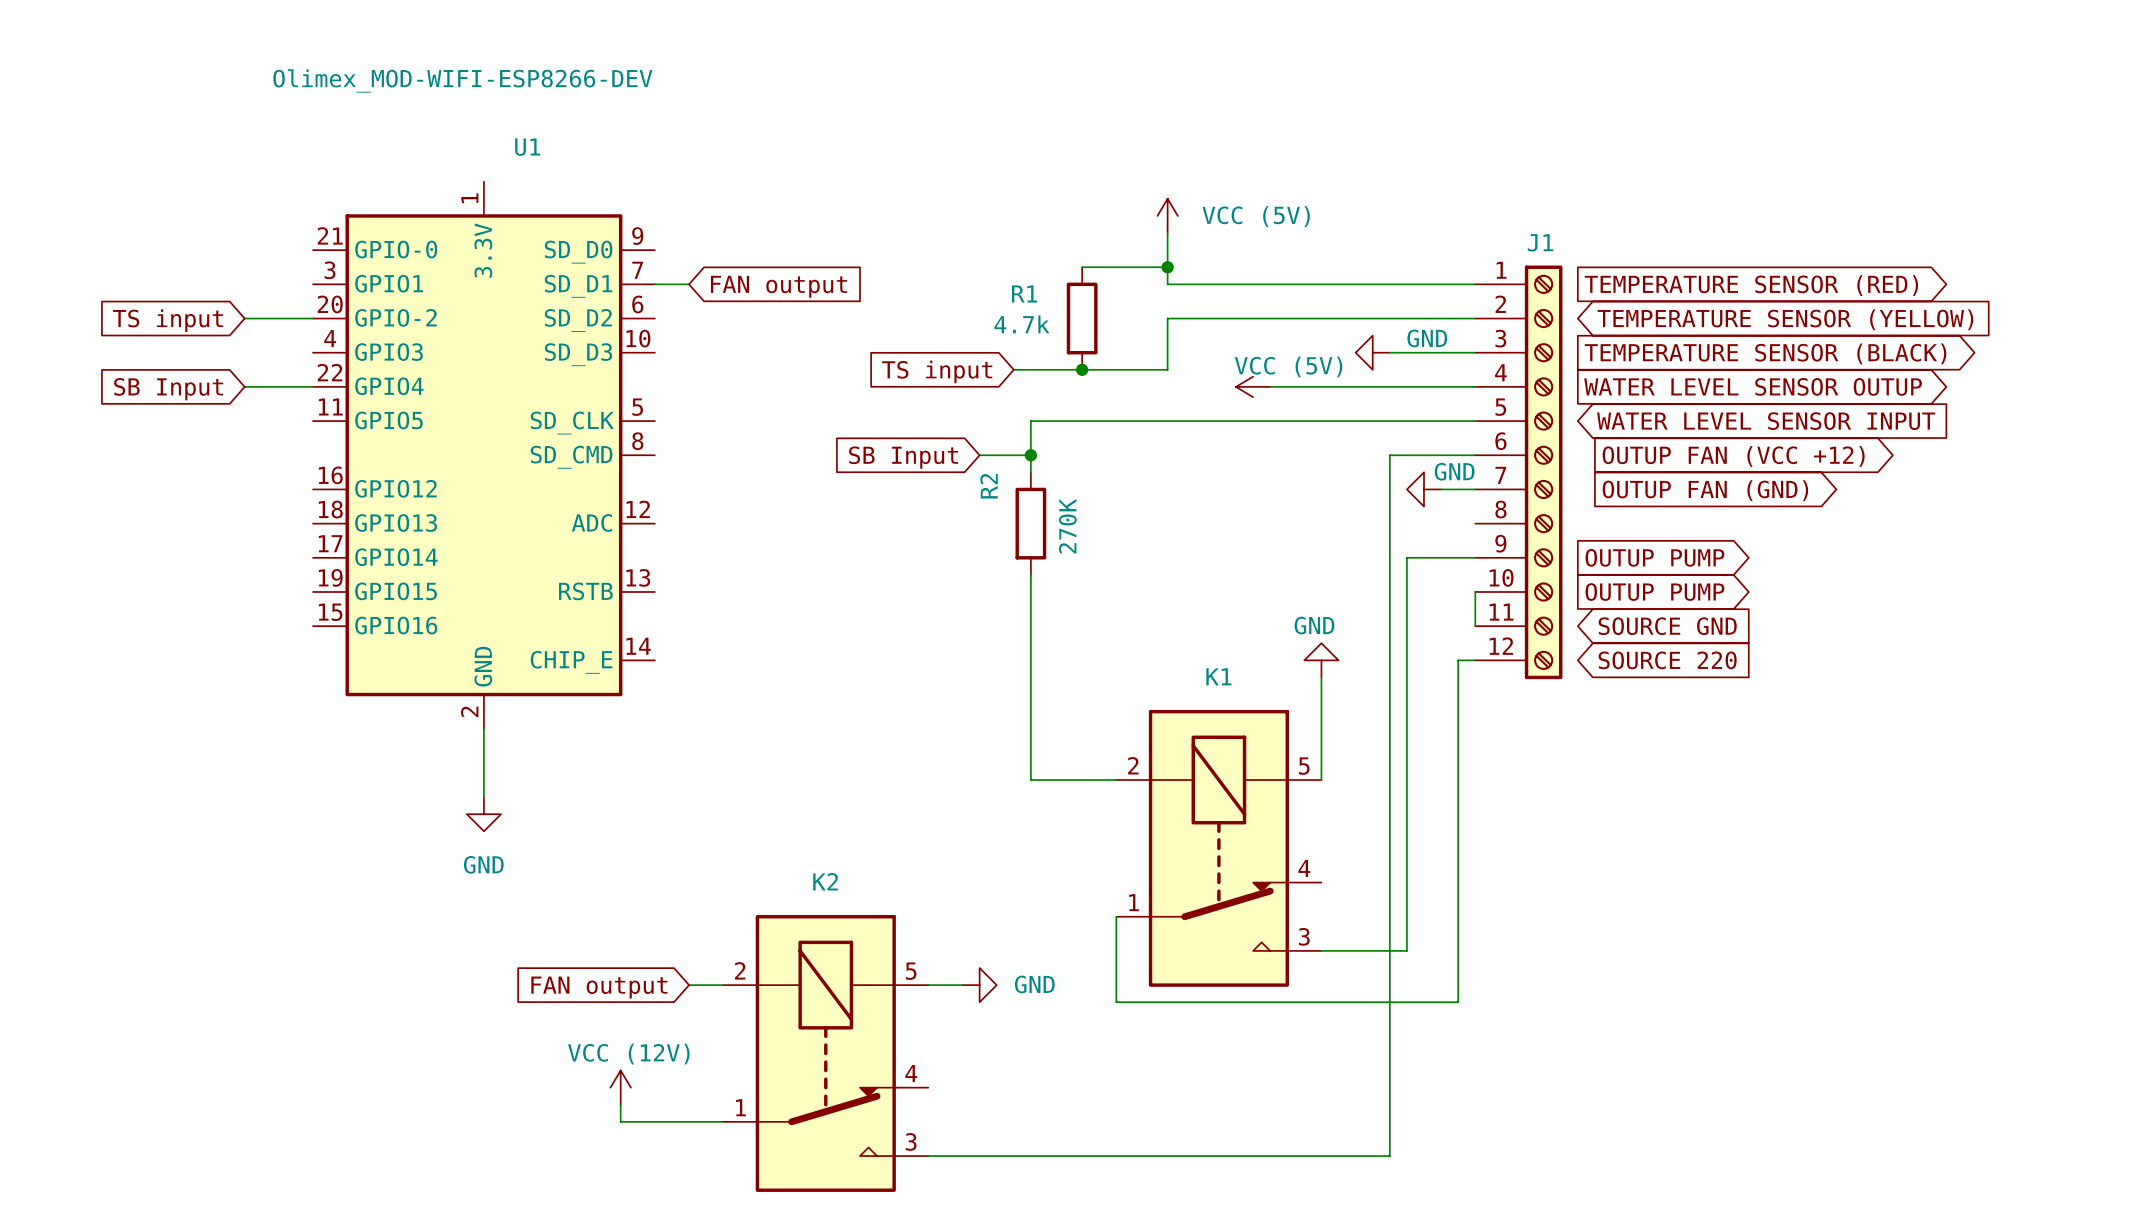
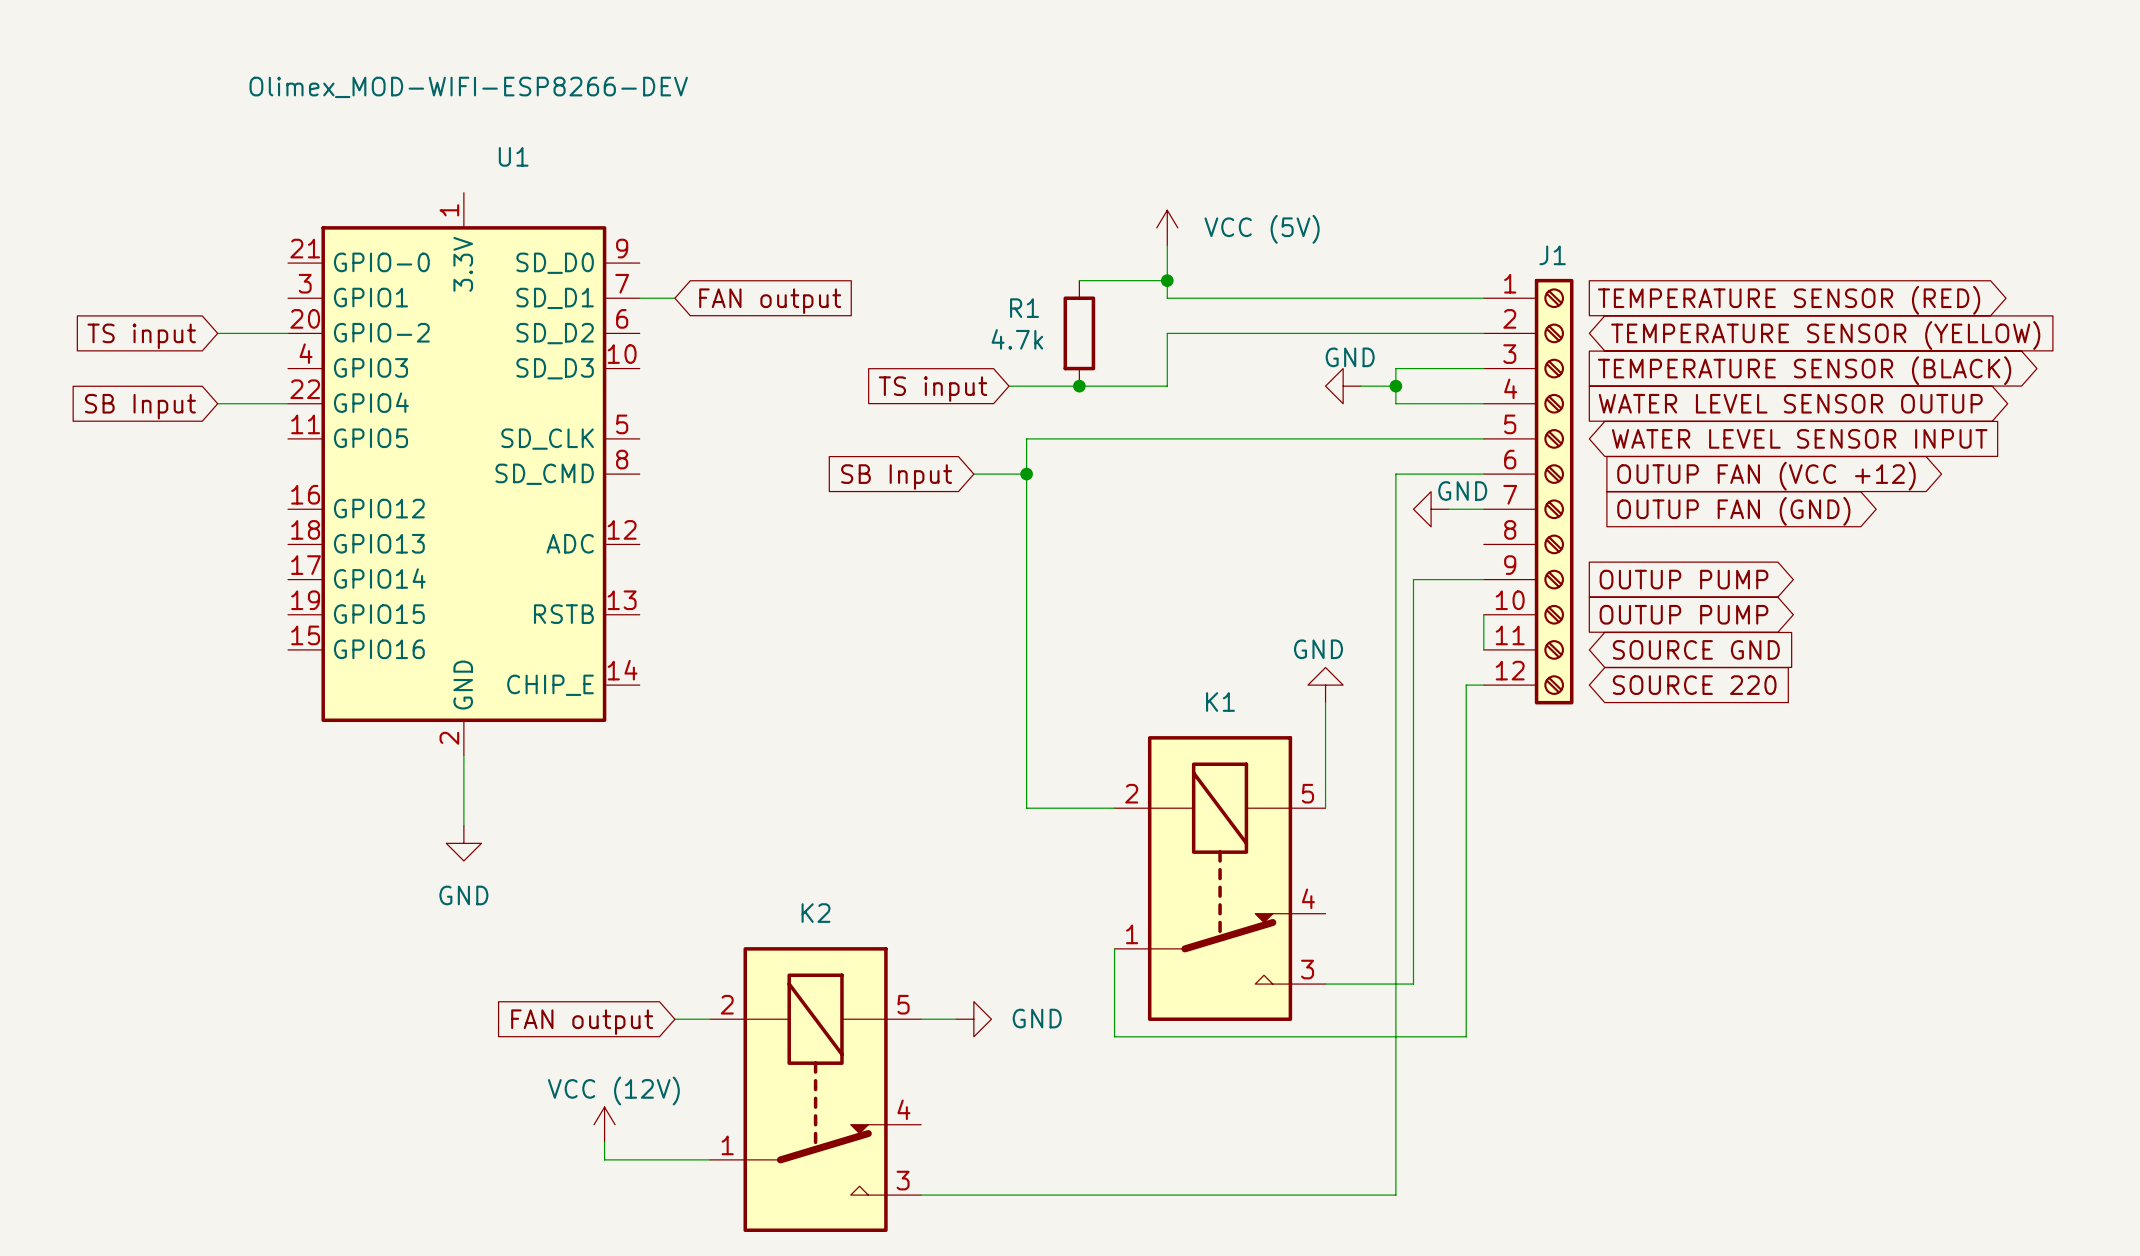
power symbol text position: GND (1427, 338) -> GND (1350, 357)
power symbol position: GND (1372, 352) -> GND (1343, 386)
wire: none -> (1360, 386) (1395, 386)
junction: none -> (1395, 386)
power symbol: VCC (5V) (1253, 386) -> none
wire: (1270, 386) (1389, 386) -> (1395, 368) (1395, 403)
wire: none -> (1026, 491) (1026, 597)
R2: 270K (1030, 523) -> none

